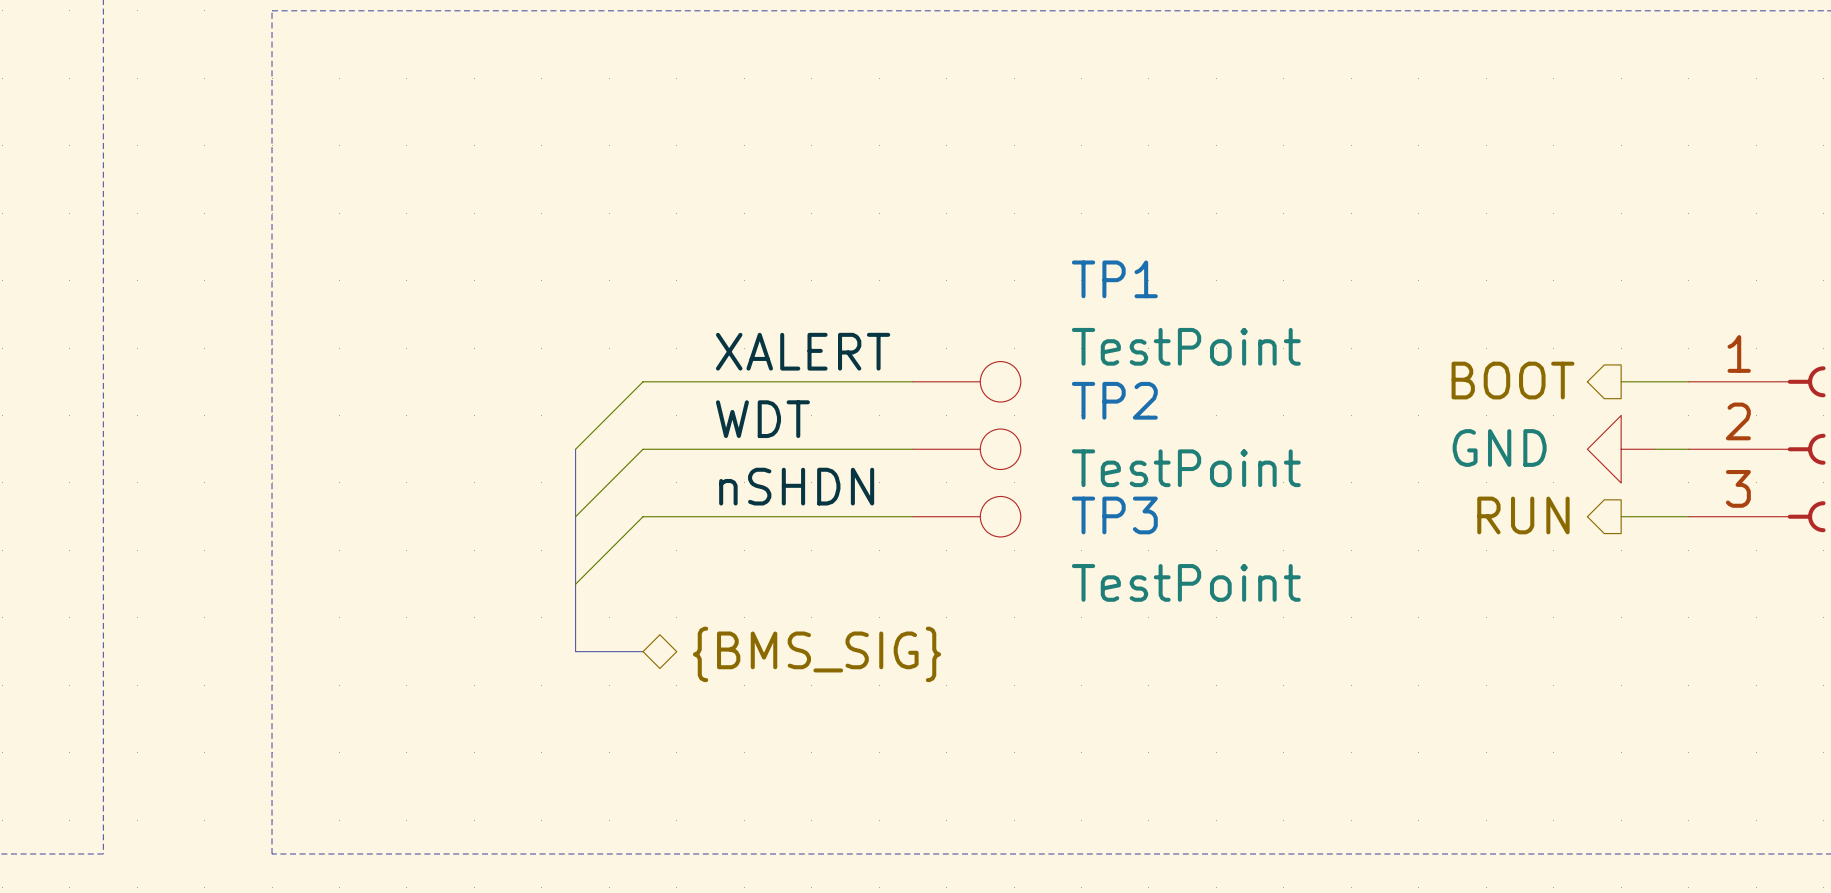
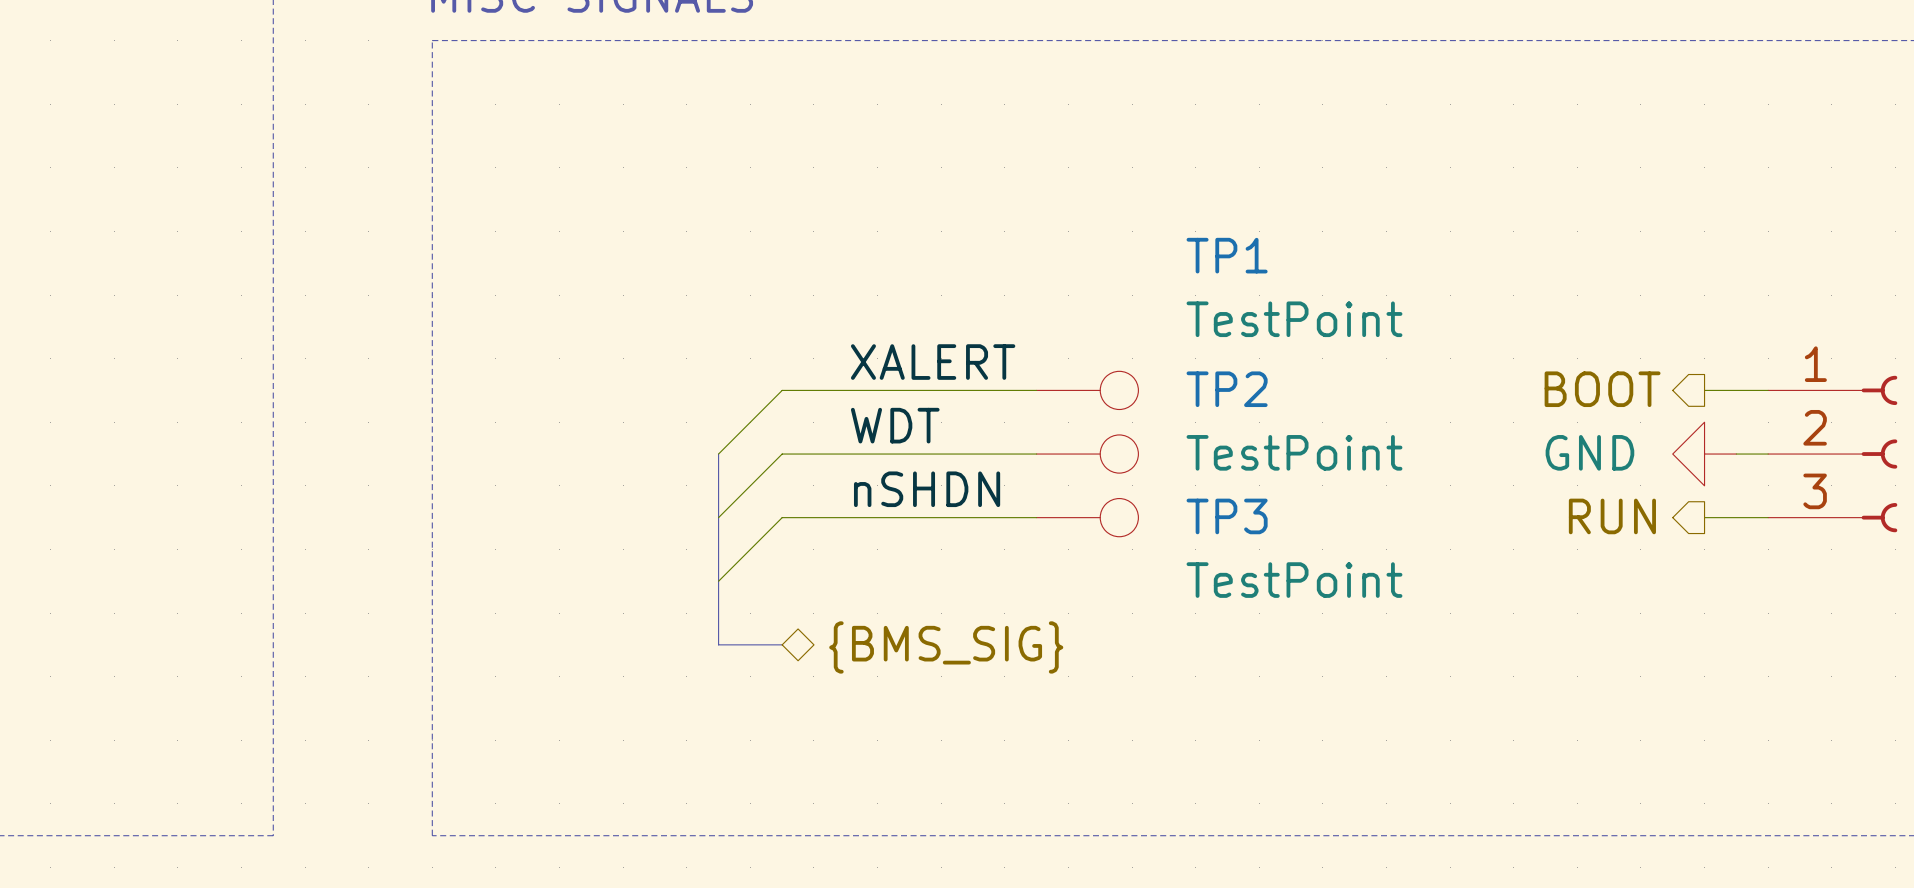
TP1 name position: TP1 (1114, 279) -> TP1 (1227, 255)
TP1 value position: TestPoint (1186, 346) -> TestPoint (1294, 319)
TP2 name position: TP2 (1114, 400) -> TP2 (1227, 389)
TP2 value position: TestPoint (1186, 468) -> TestPoint (1294, 452)

